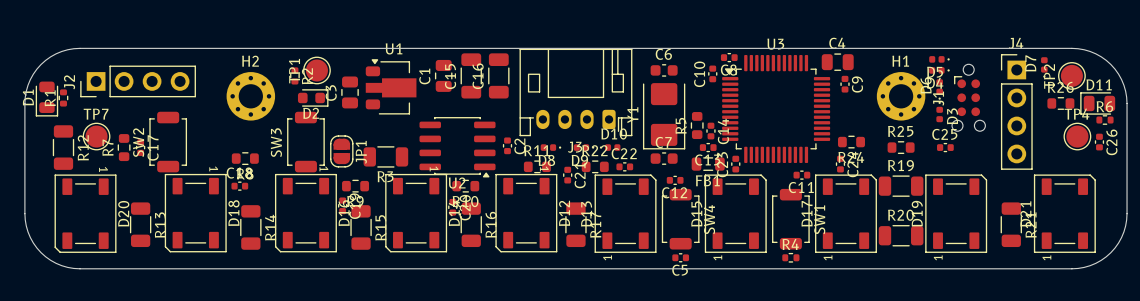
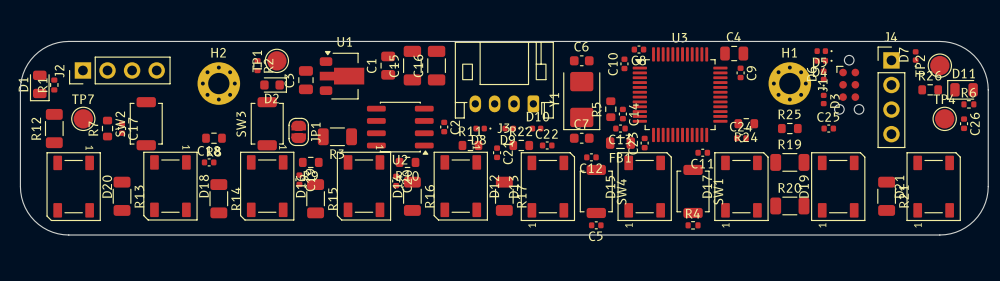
R12 name position: R12 (83, 147) -> R12 (36, 128)
C24 rotation: 0° (840, 164) -> 90° clockwise (741, 138)

